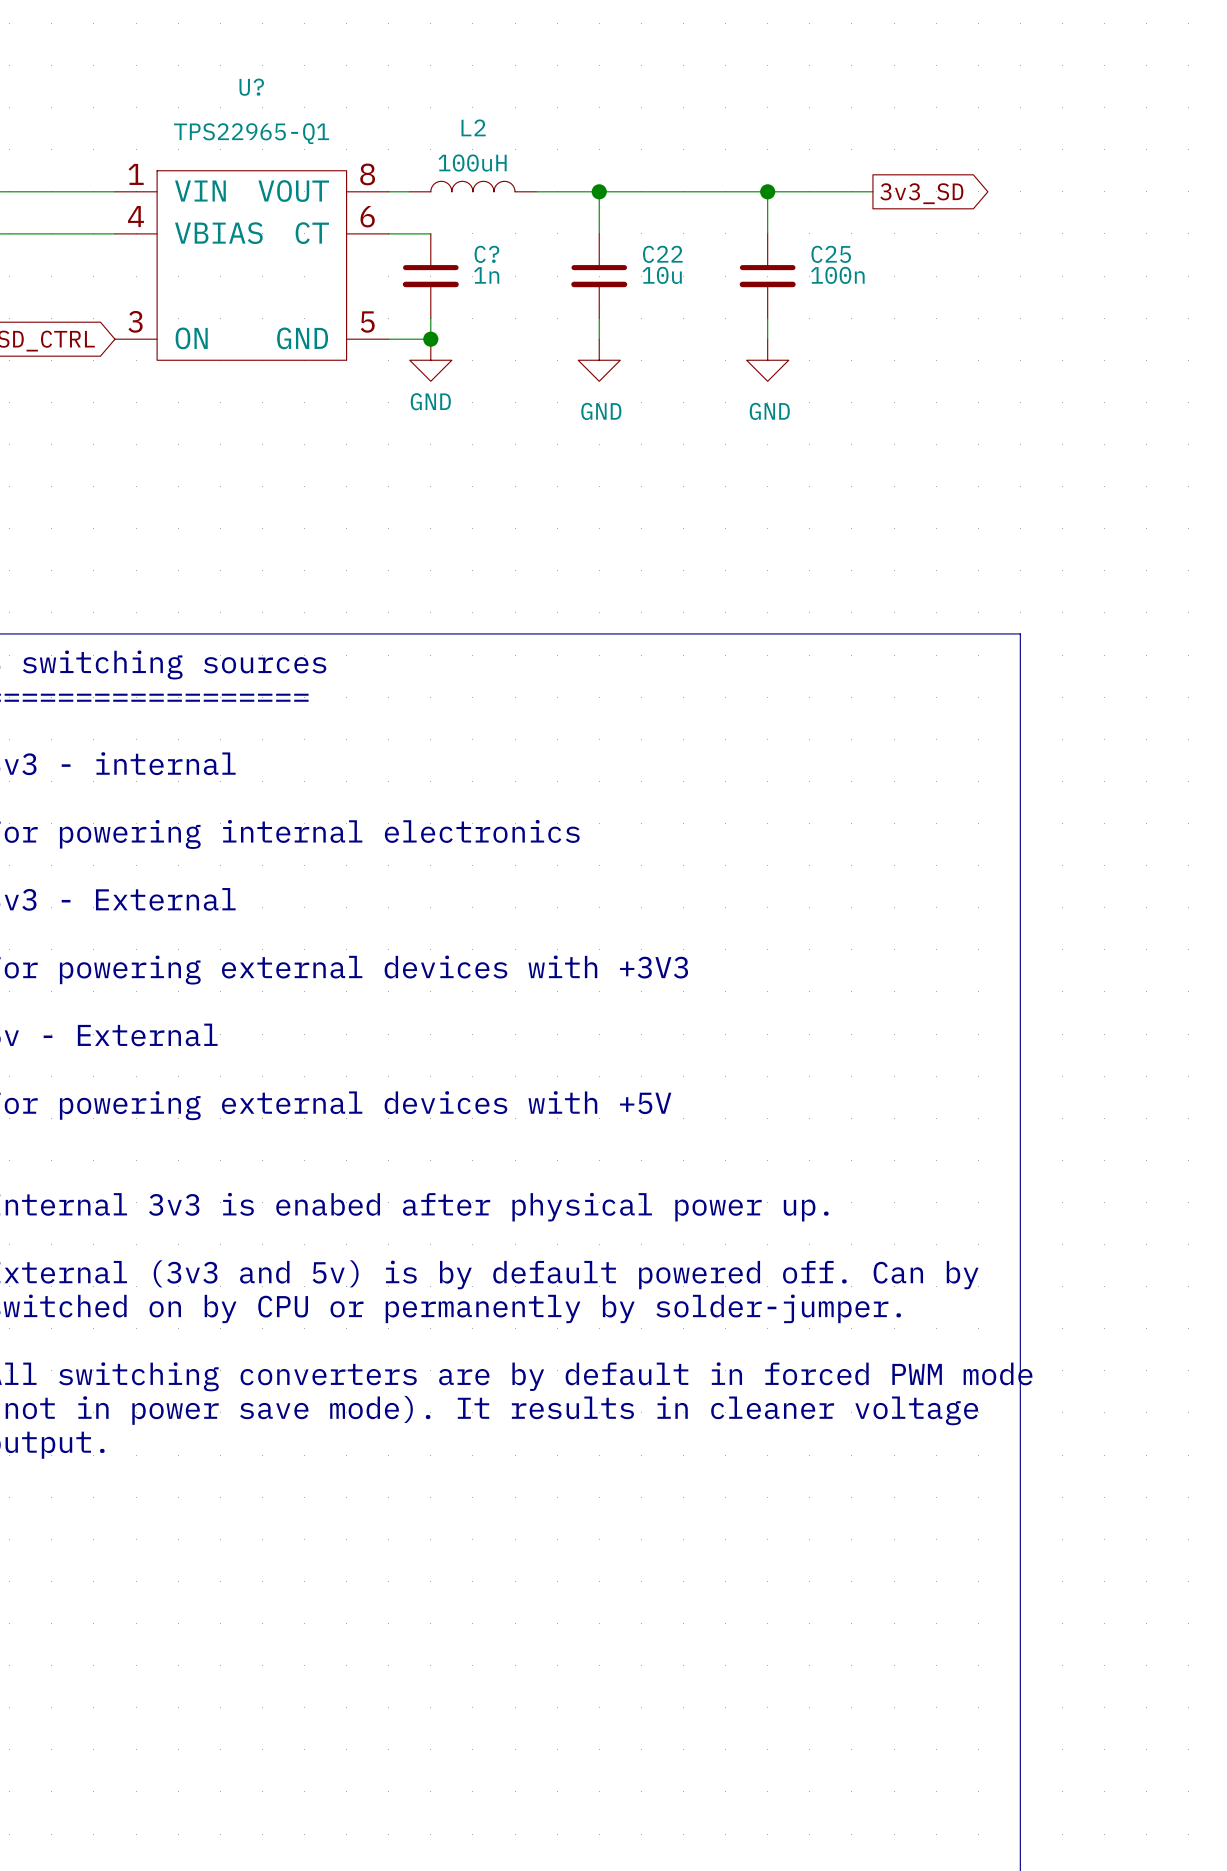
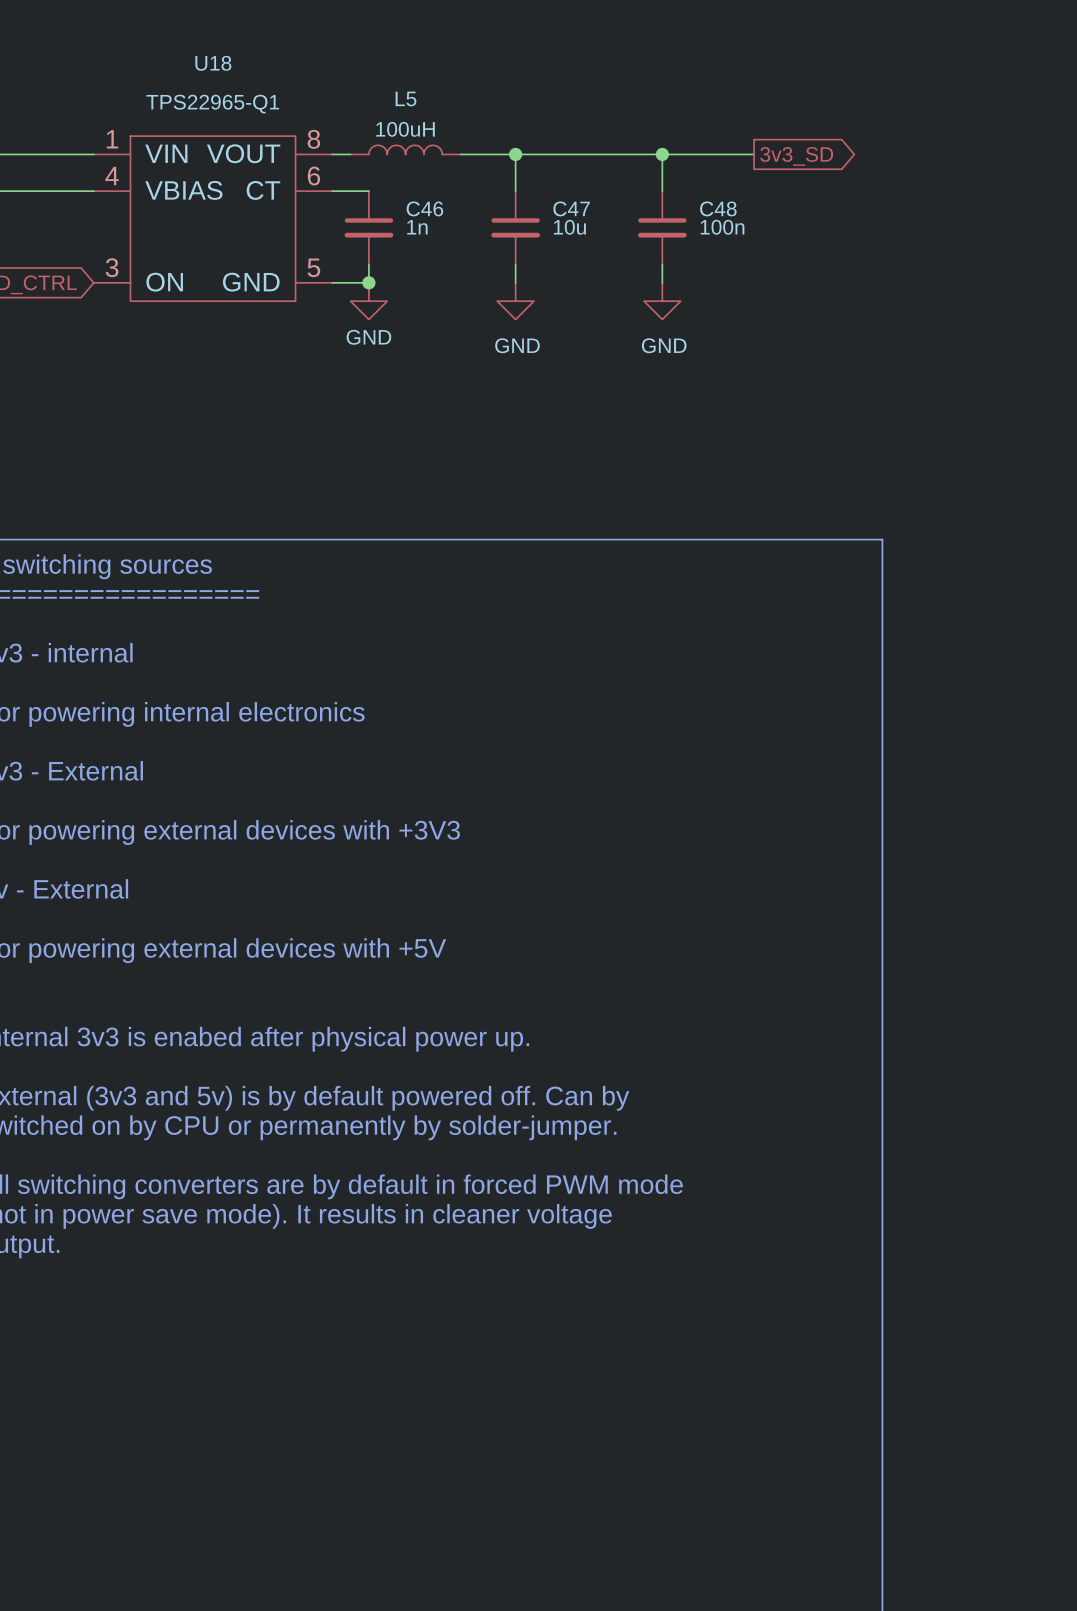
U? name: U? (251, 87) -> U18 (213, 63)
L2 name: L2 (473, 127) -> L5 (406, 98)
C? name: C? (486, 254) -> C46 (424, 208)
C22 name: C22 (662, 254) -> C47 (571, 208)
C25 name: C25 (831, 254) -> C48 (718, 208)

